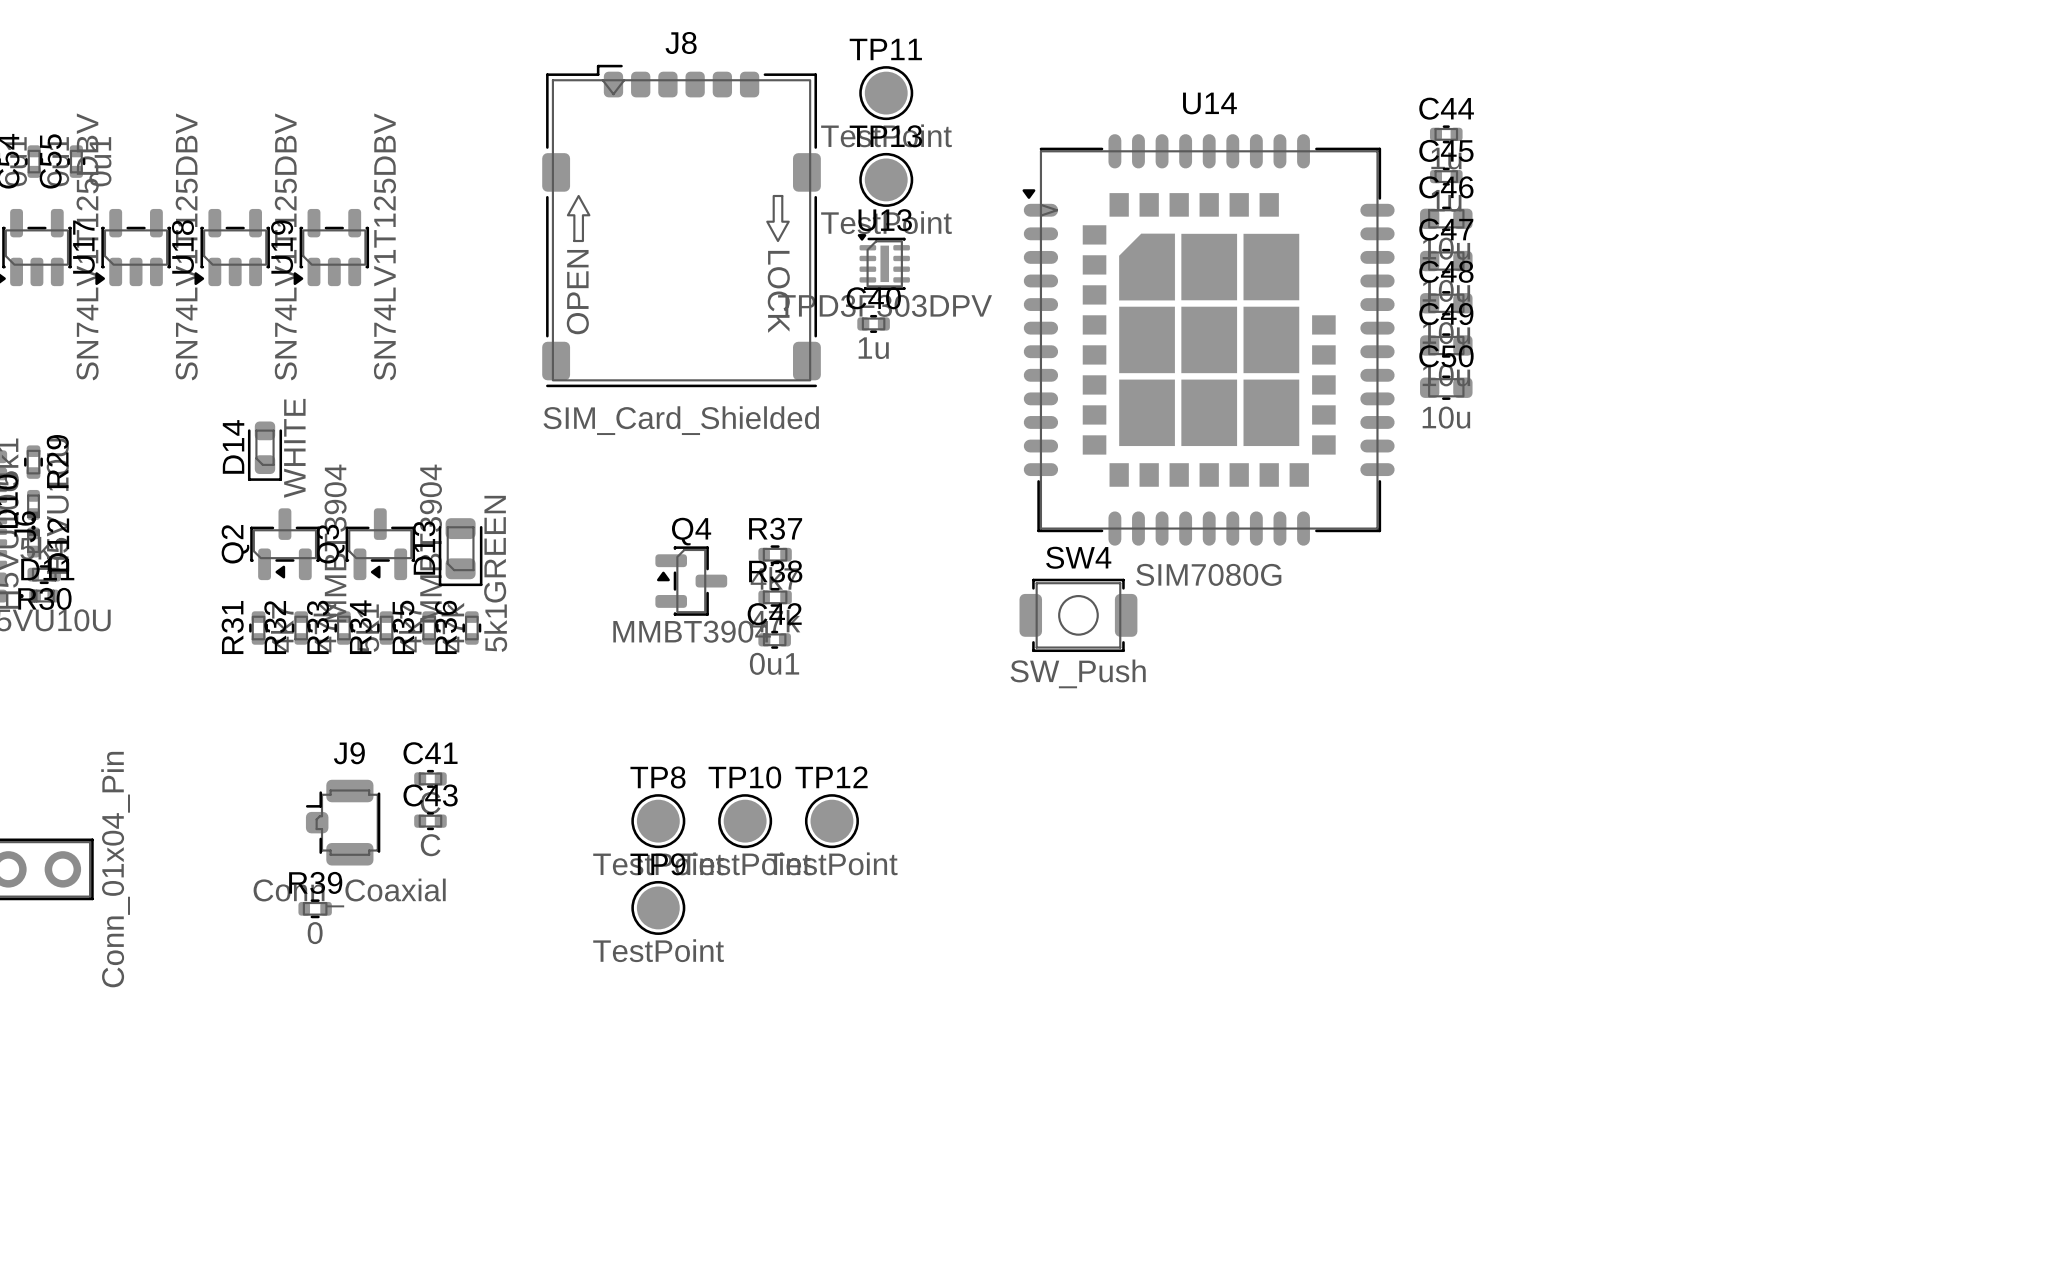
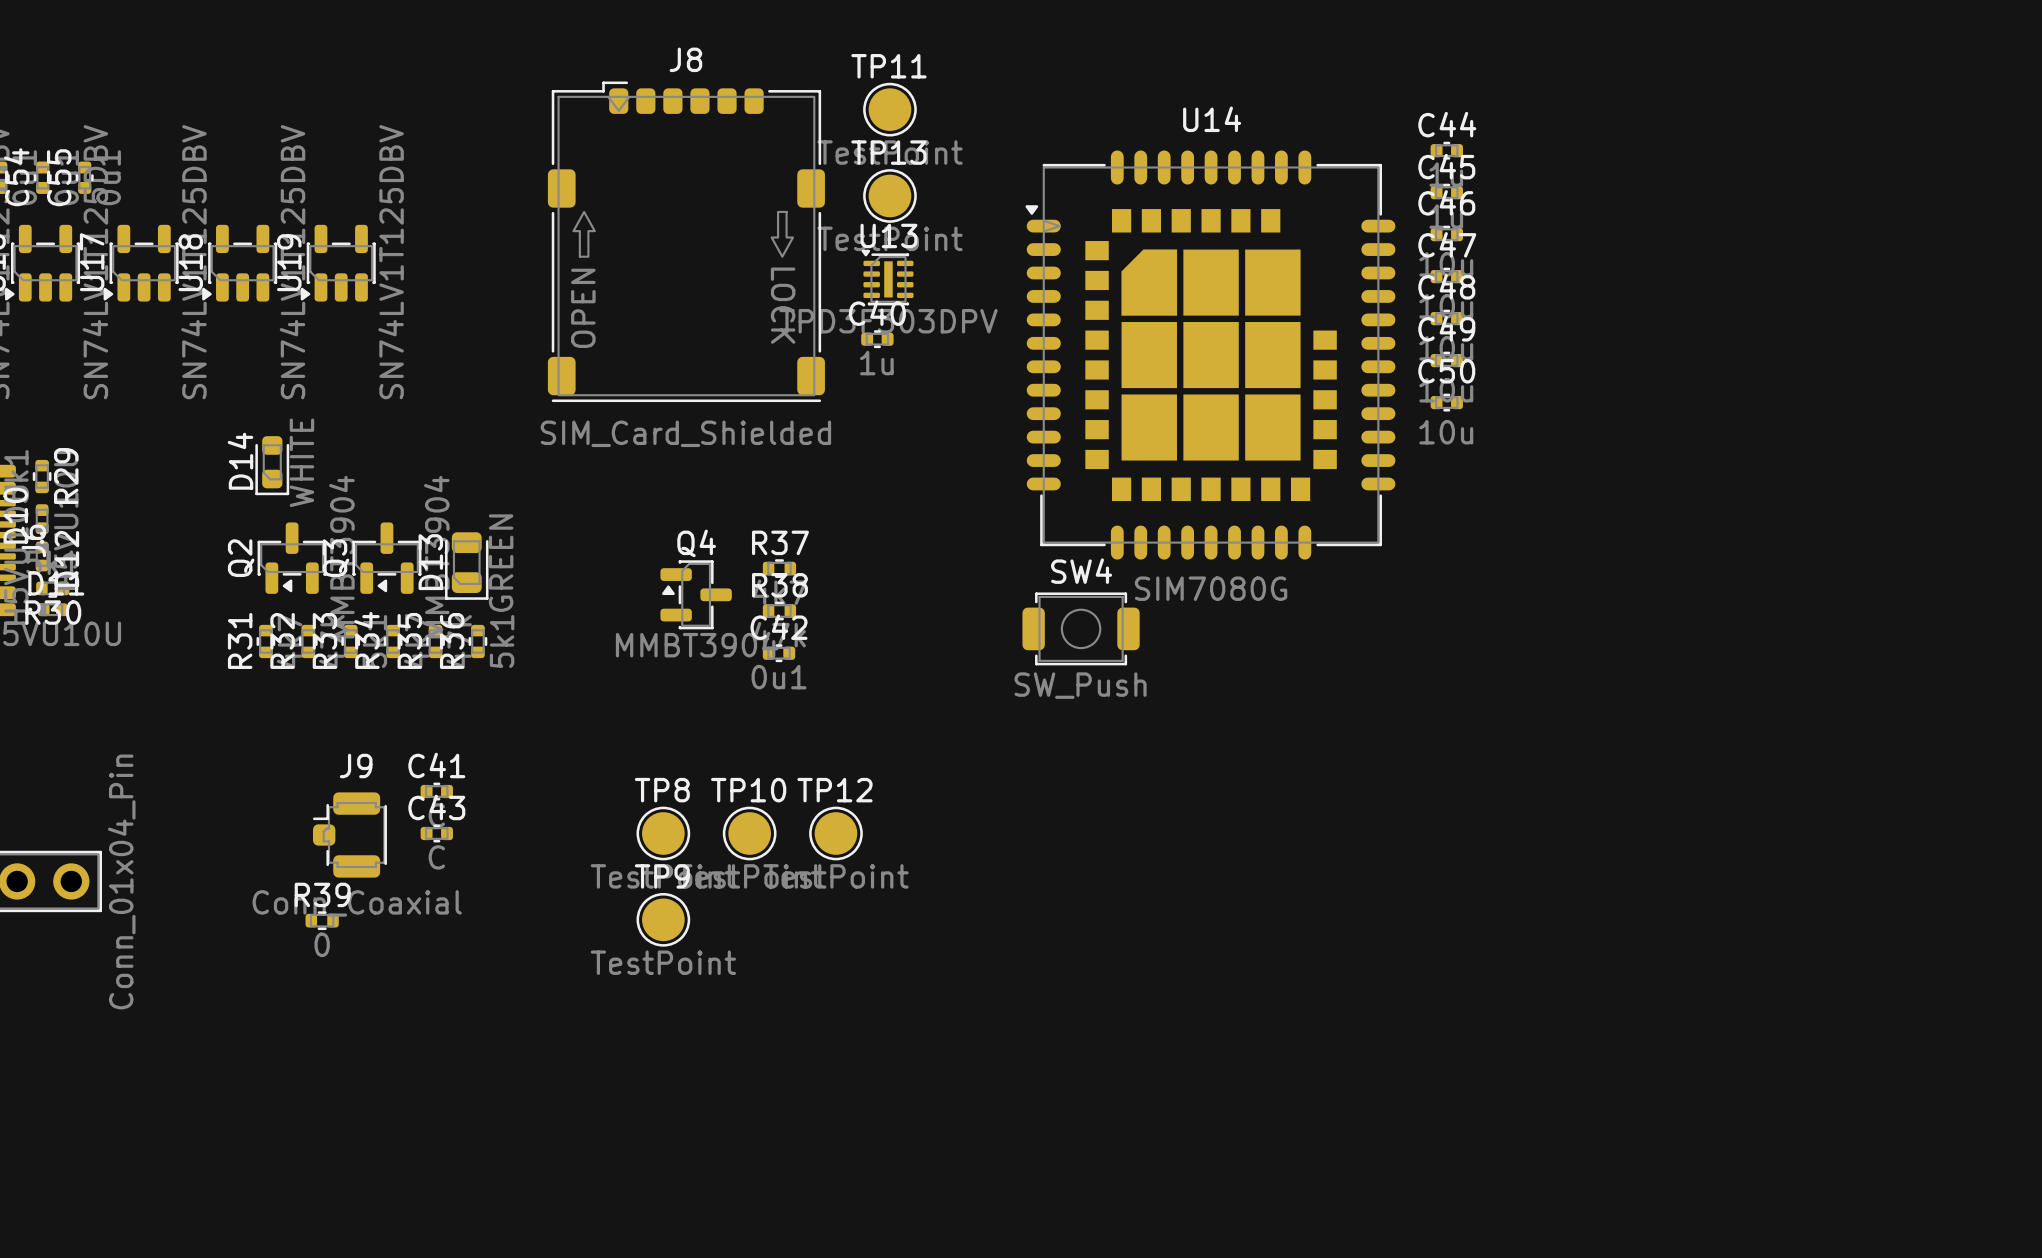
C46 footprint: [1420, 206, 1473, 232] -> [1430, 225, 1463, 244]
C47 footprint: [1420, 248, 1473, 274] -> [1430, 267, 1463, 286]
C48 footprint: [1420, 291, 1473, 316] -> [1430, 309, 1463, 328]
C49 footprint: [1420, 333, 1473, 358] -> [1430, 351, 1463, 370]
C50 footprint: [1420, 375, 1473, 400] -> [1430, 393, 1463, 412]

